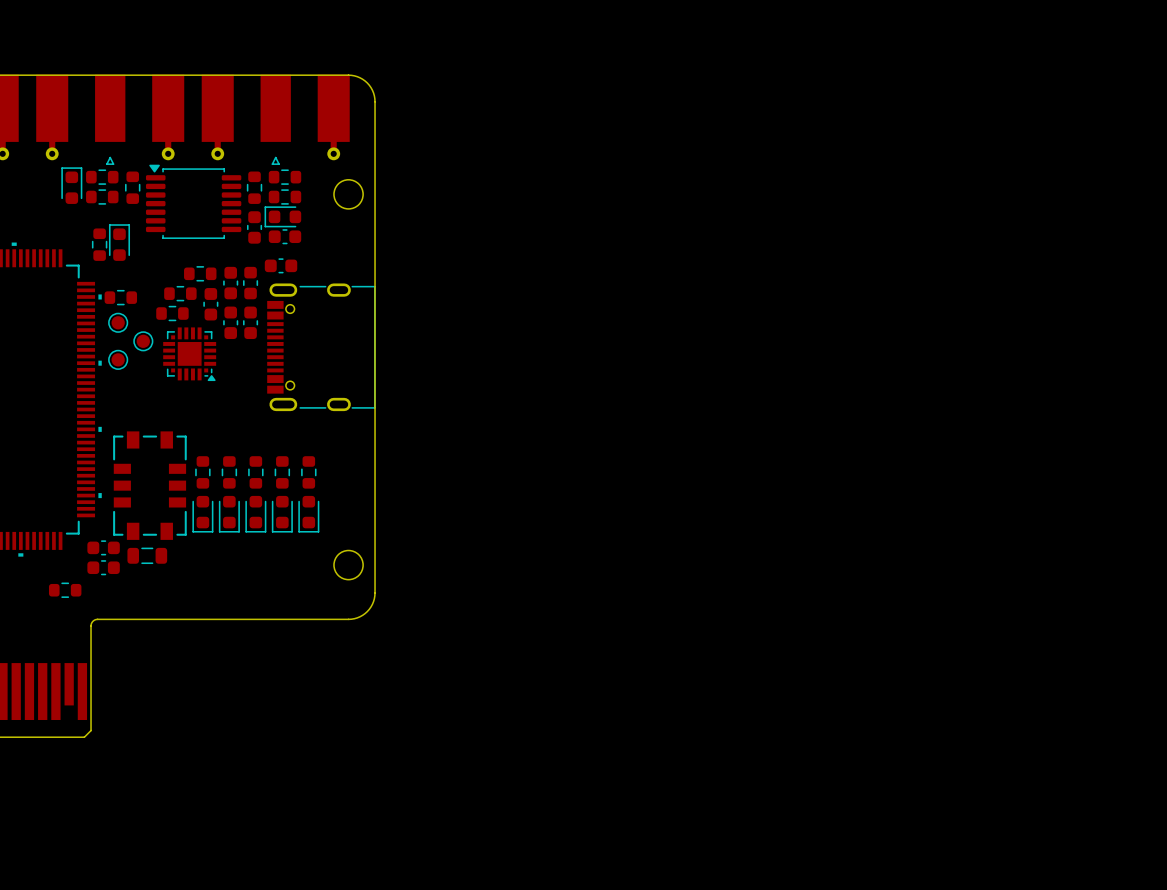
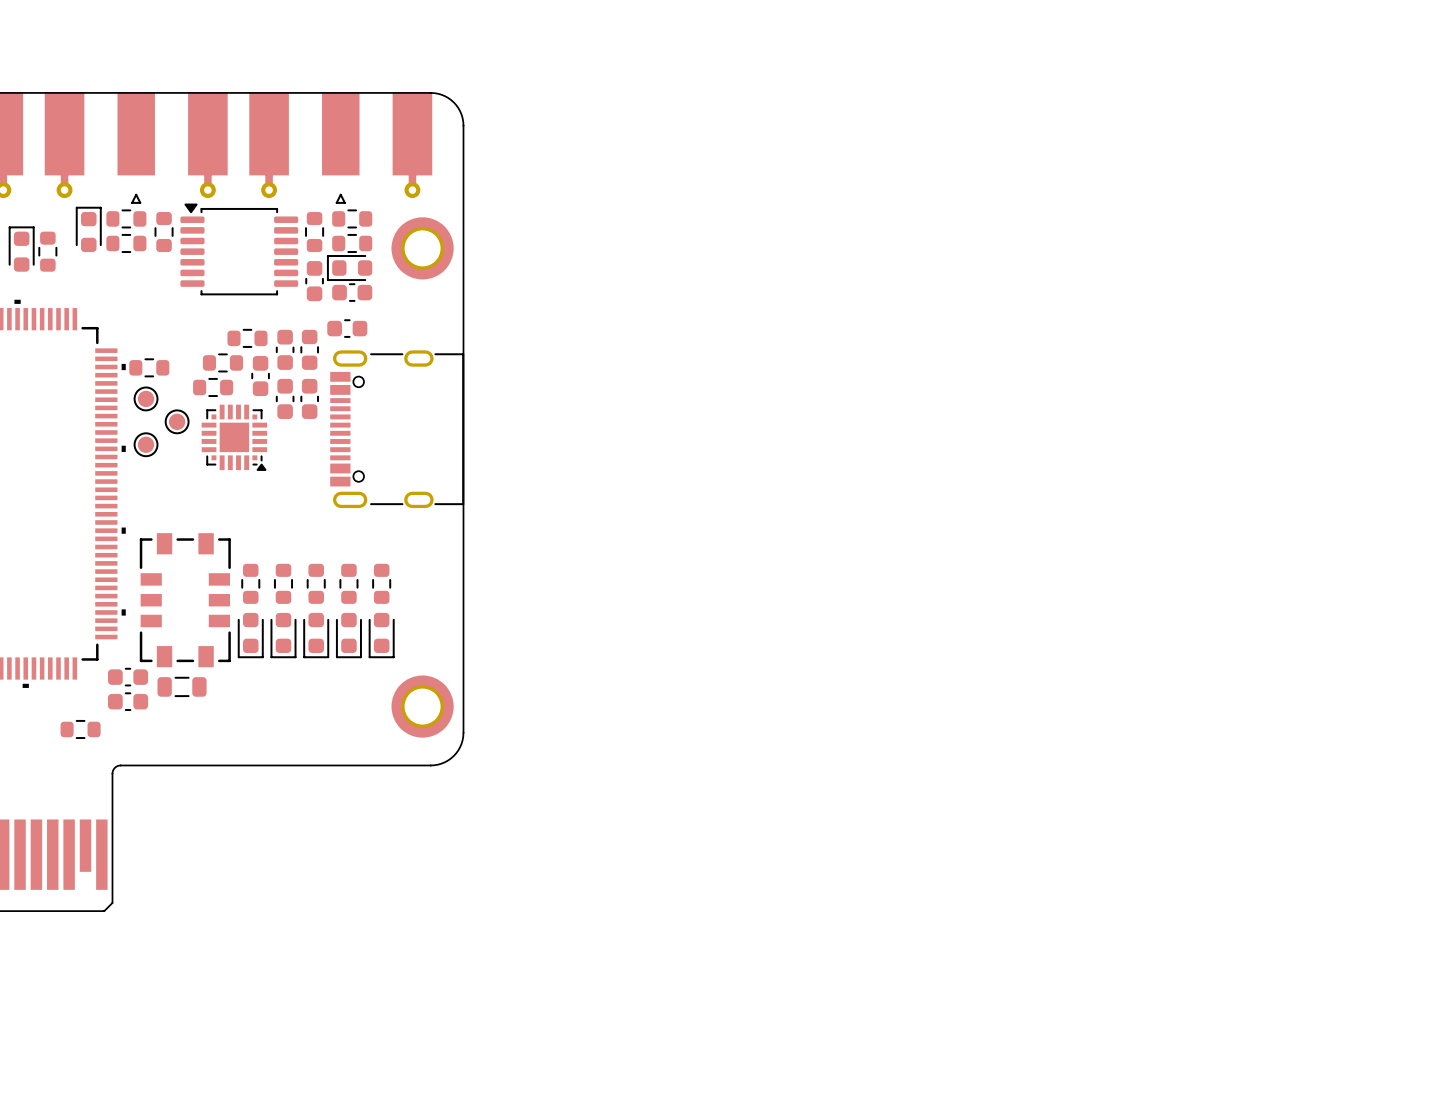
round board edge: [333, 179, 364, 210] -> none
part: none -> (422, 248)
part position: (119, 242) -> (21, 249)
part position: (99, 244) -> (47, 251)
round board edge: [333, 549, 364, 581] -> none
part: none -> (422, 706)

